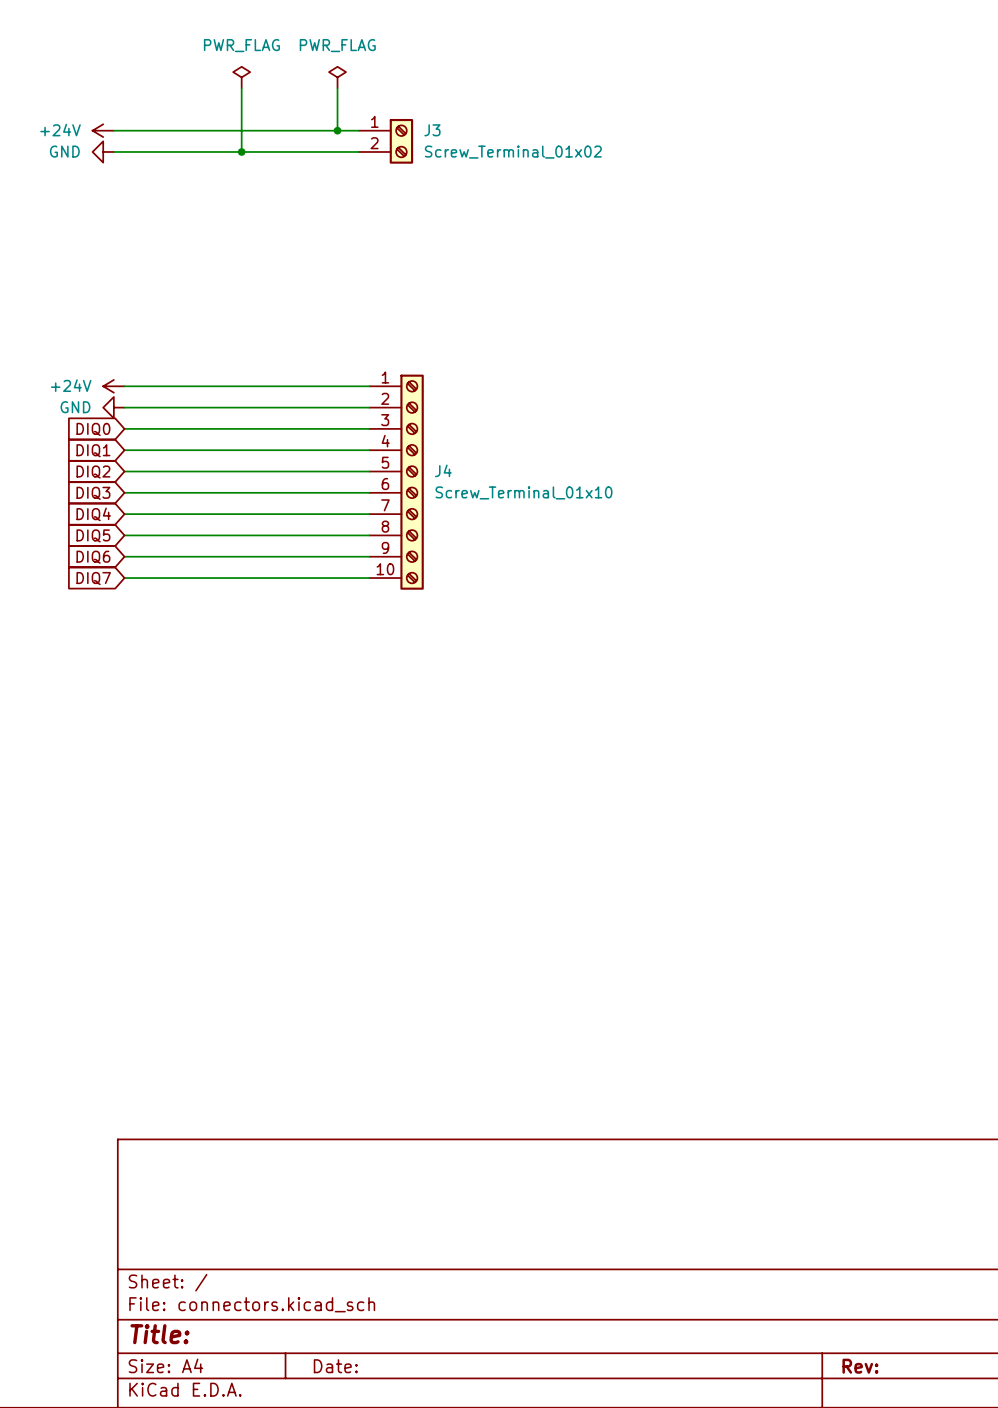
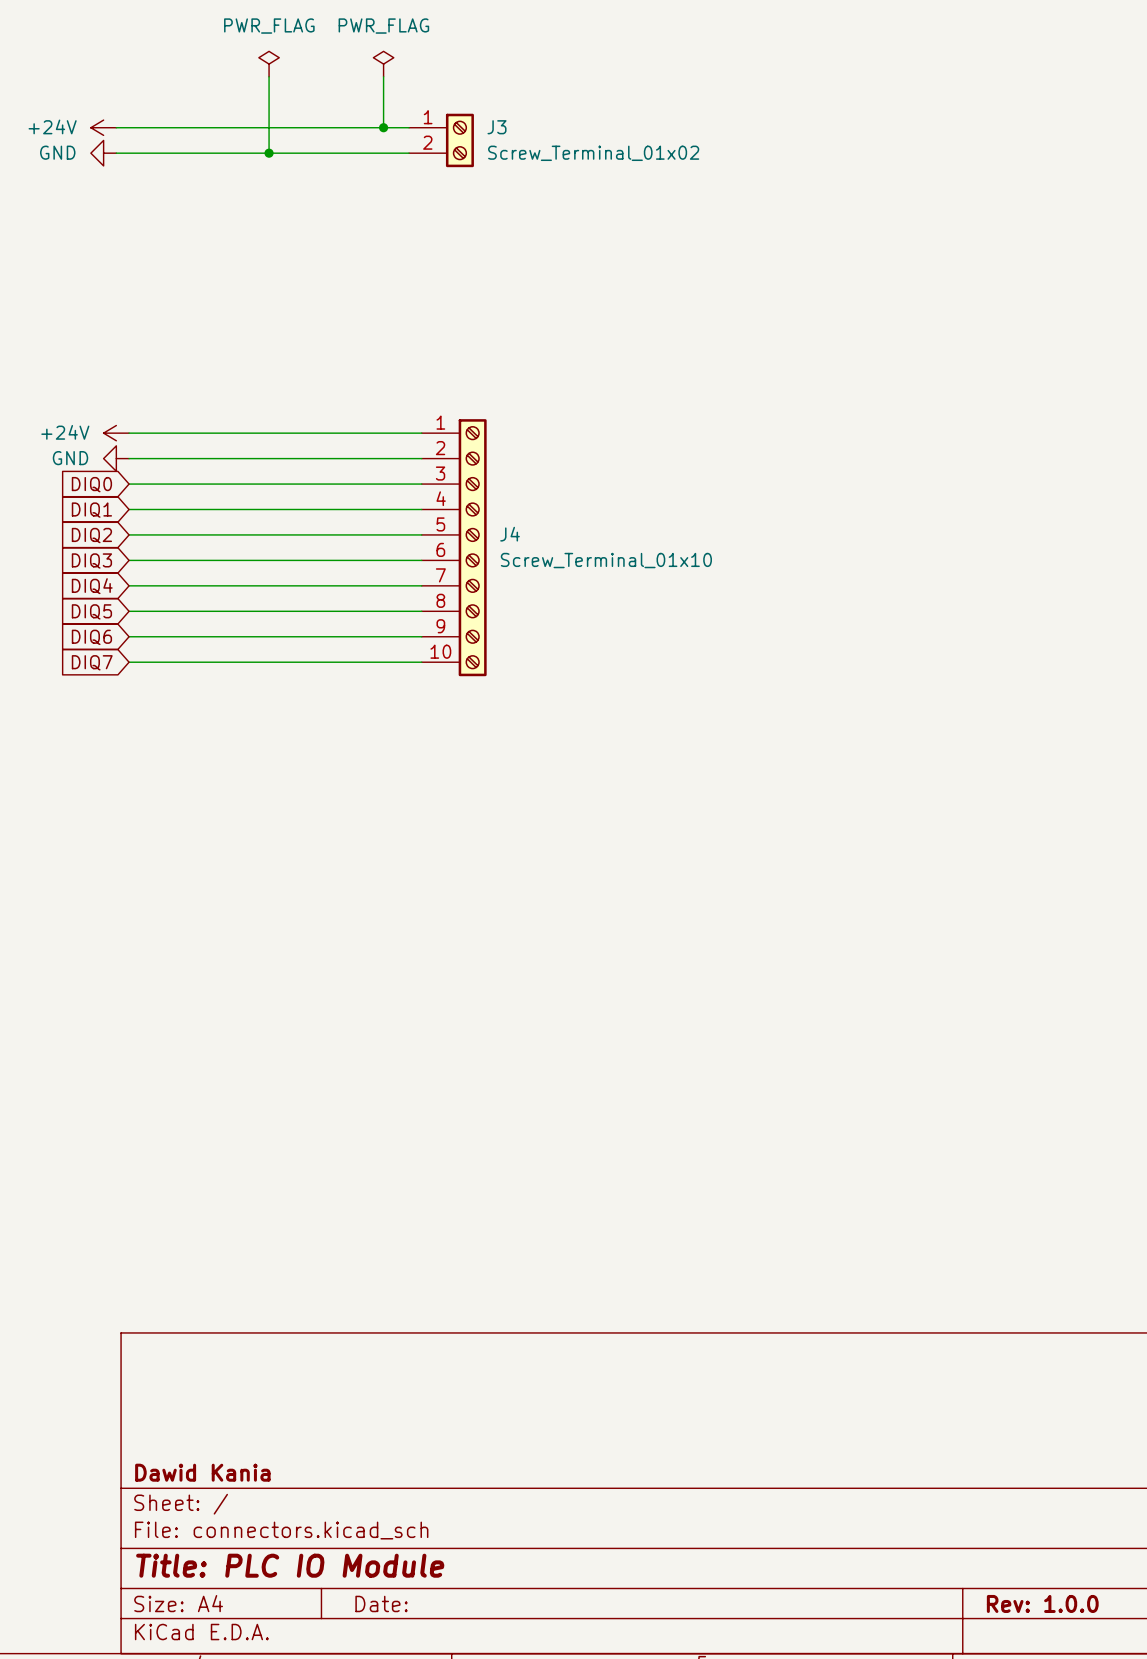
title block: none -> Dawid Kania (202, 1472)
title block: Title: (159, 1334) -> Title: PLC IO Module (290, 1565)
title block: Rev: (860, 1366) -> Rev: 1.0.0 (1042, 1603)

